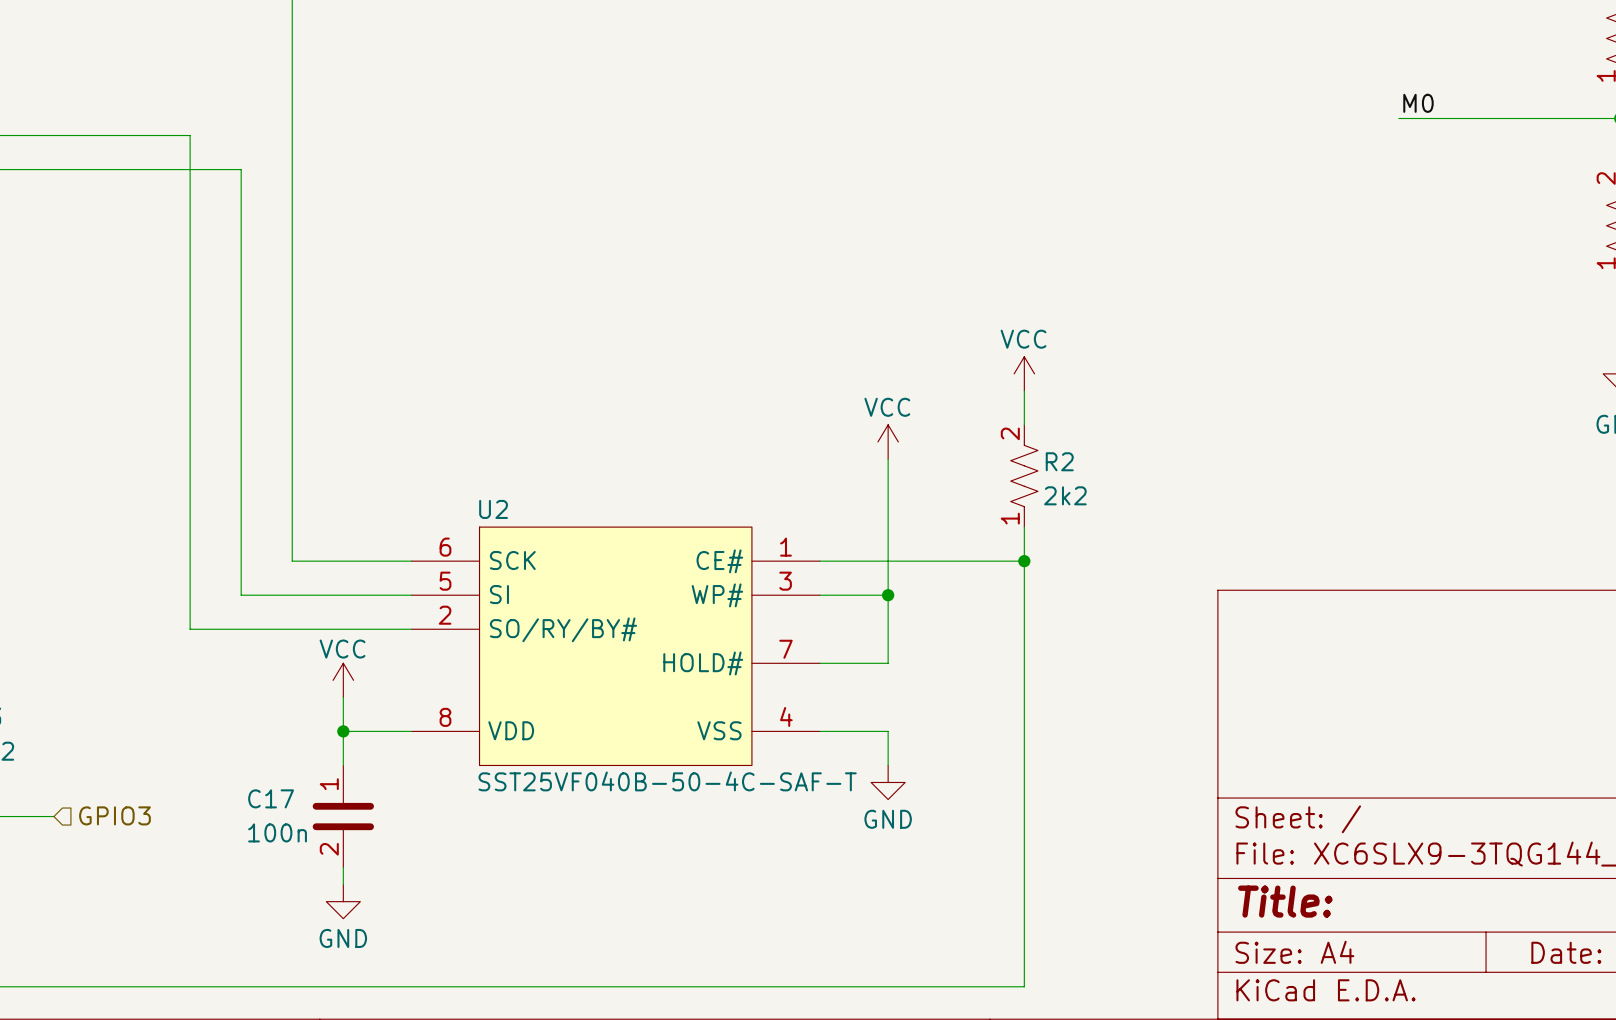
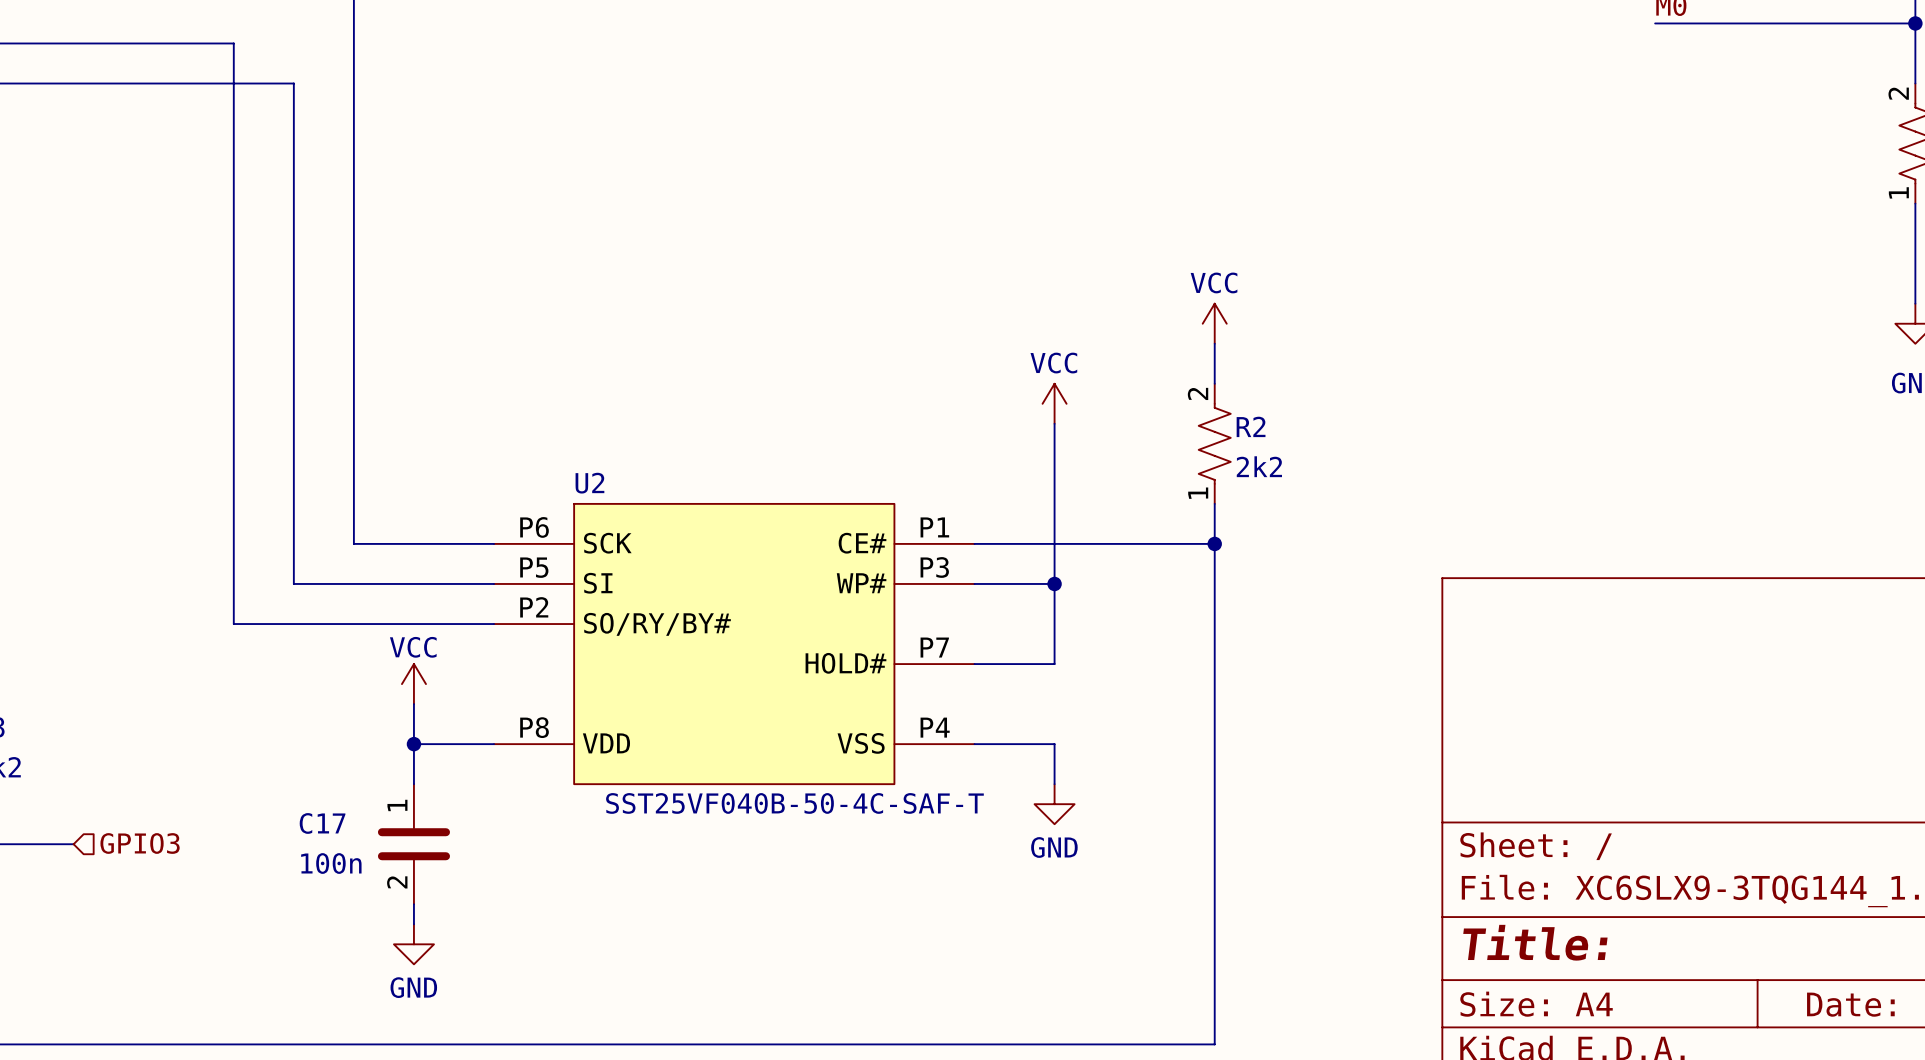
U2 pin number: 6 (445, 547) -> P6 (534, 527)
U2 pin number: 1 (785, 547) -> P1 (934, 527)
U2 pin number: 5 (445, 581) -> P5 (534, 567)
U2 pin number: 3 (785, 581) -> P3 (934, 567)
U2 pin number: 2 (445, 615) -> P2 (534, 607)
U2 pin number: 7 (785, 649) -> P7 (934, 647)
U2 pin number: 4 (786, 716) -> P4 (935, 727)
U2 pin number: 8 (445, 717) -> P8 (534, 727)

